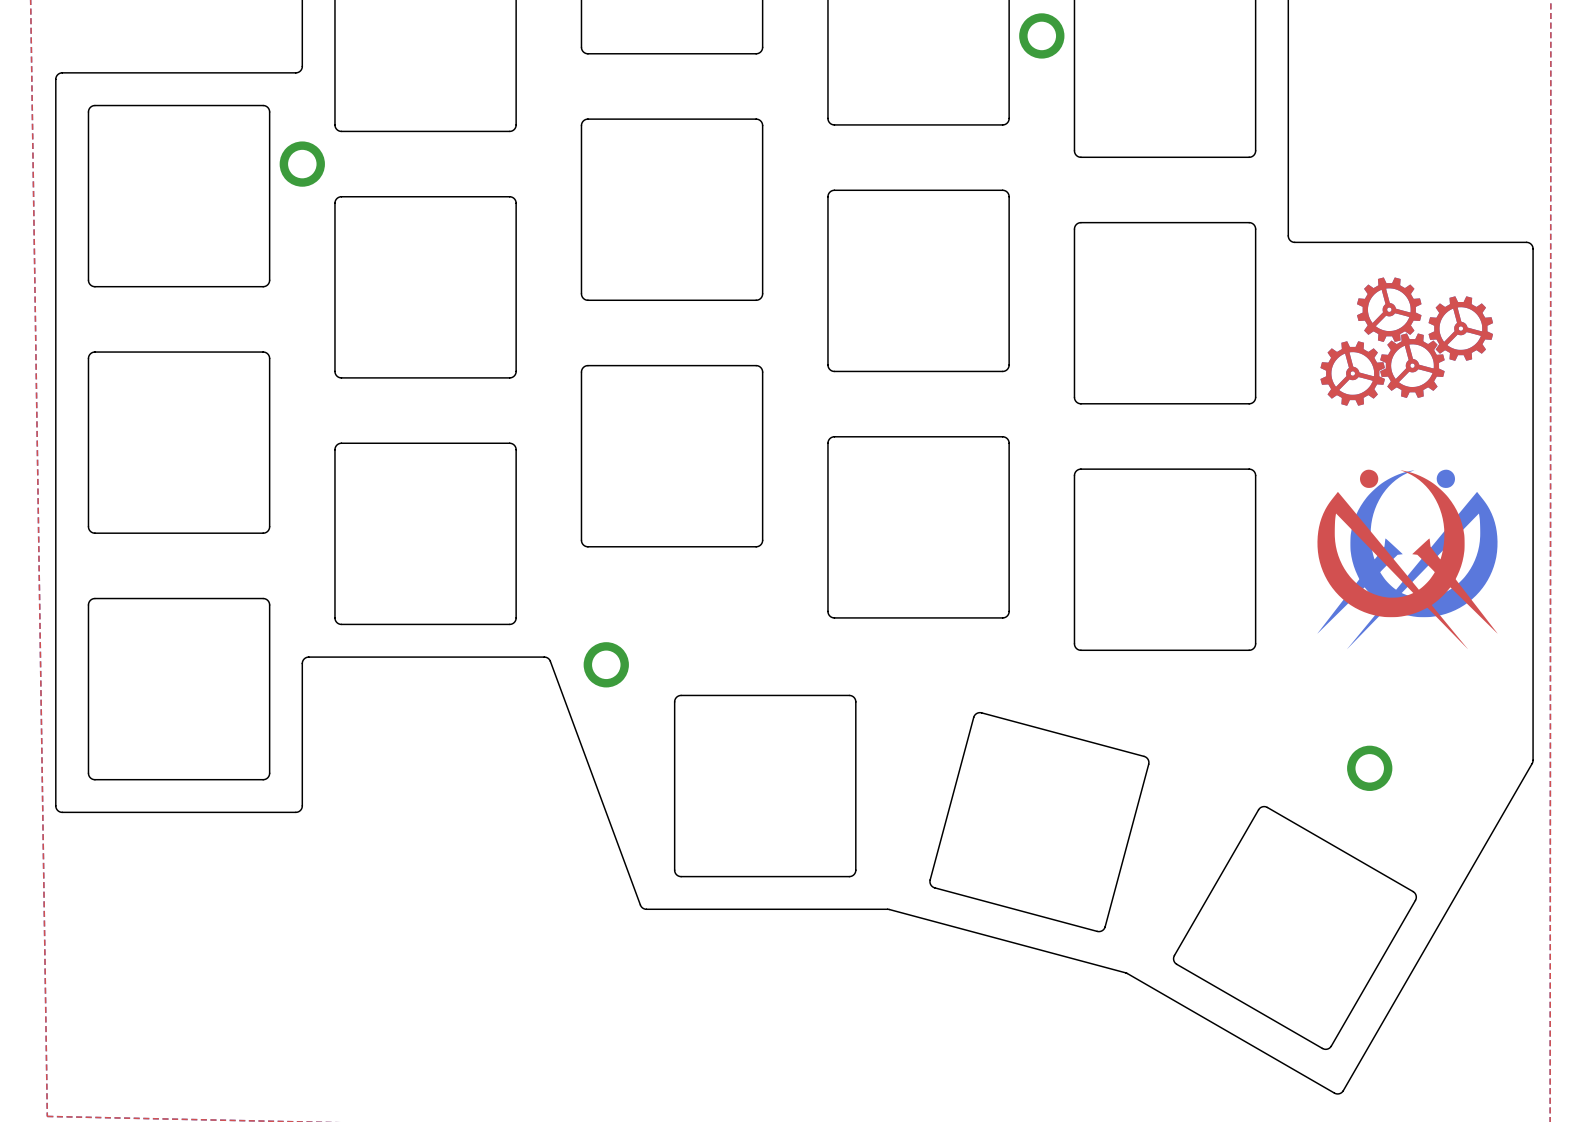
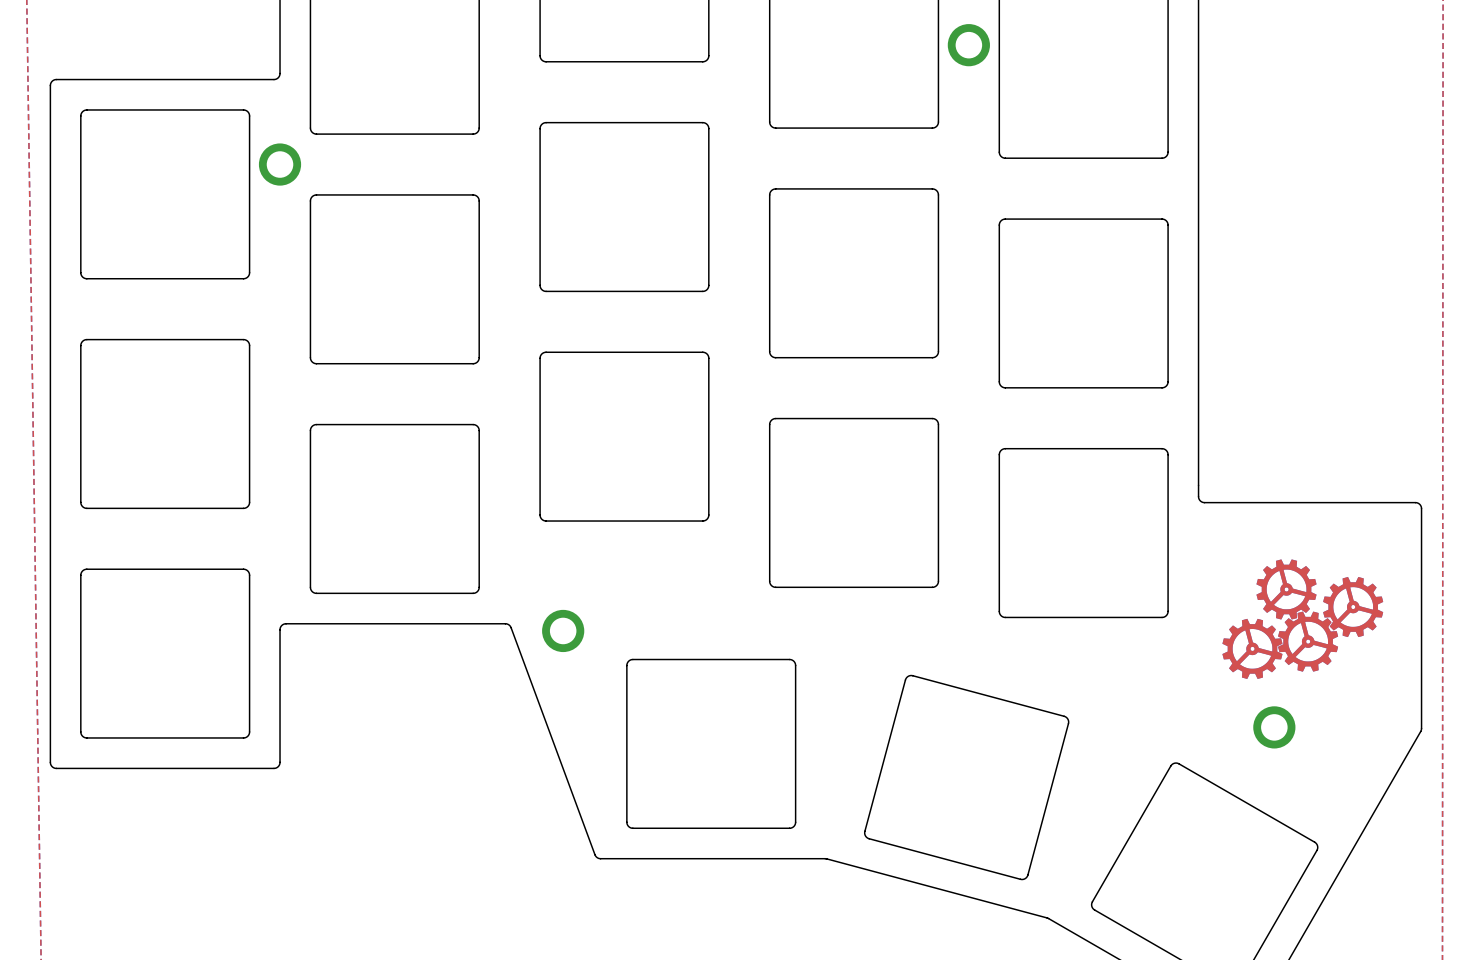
board edge: (1288, 235) (1290, 240) (1294, 242) (1526, 242) (1532, 246) (1533, 760) (1526, 772) -> (1198, 231) (1199, 498) (1204, 502) (1415, 502) (1419, 504) (1421, 508) (1420, 731)
drawing position: (1406, 341) -> (1302, 619)
drawing: [1317, 469, 1498, 650] -> none

